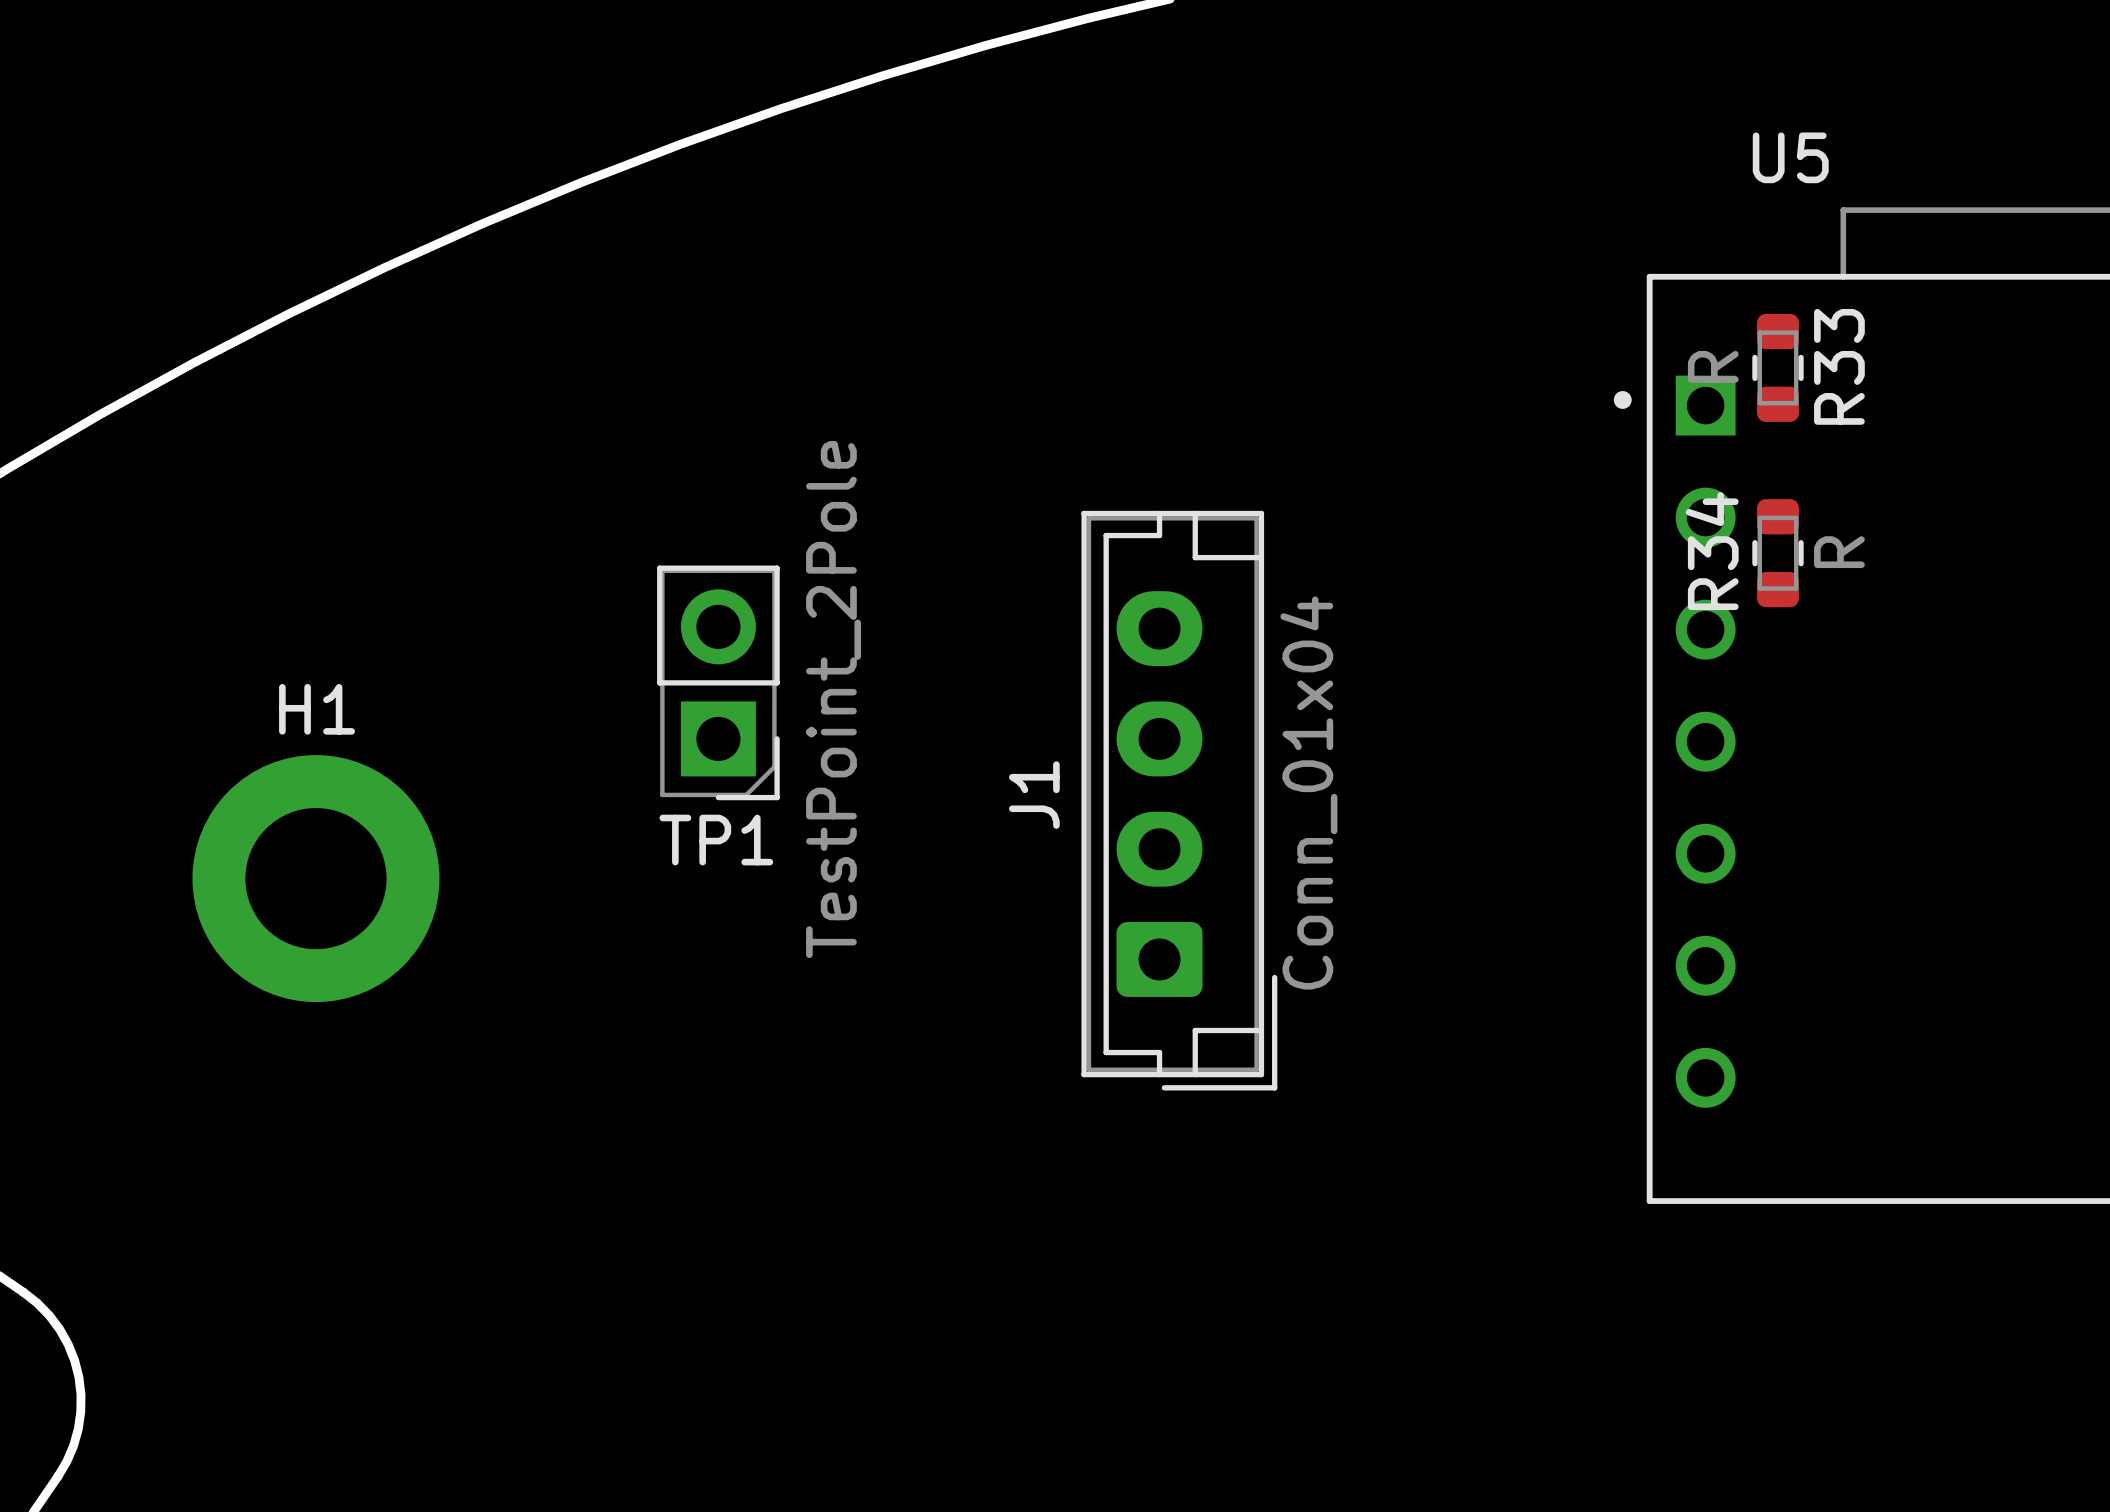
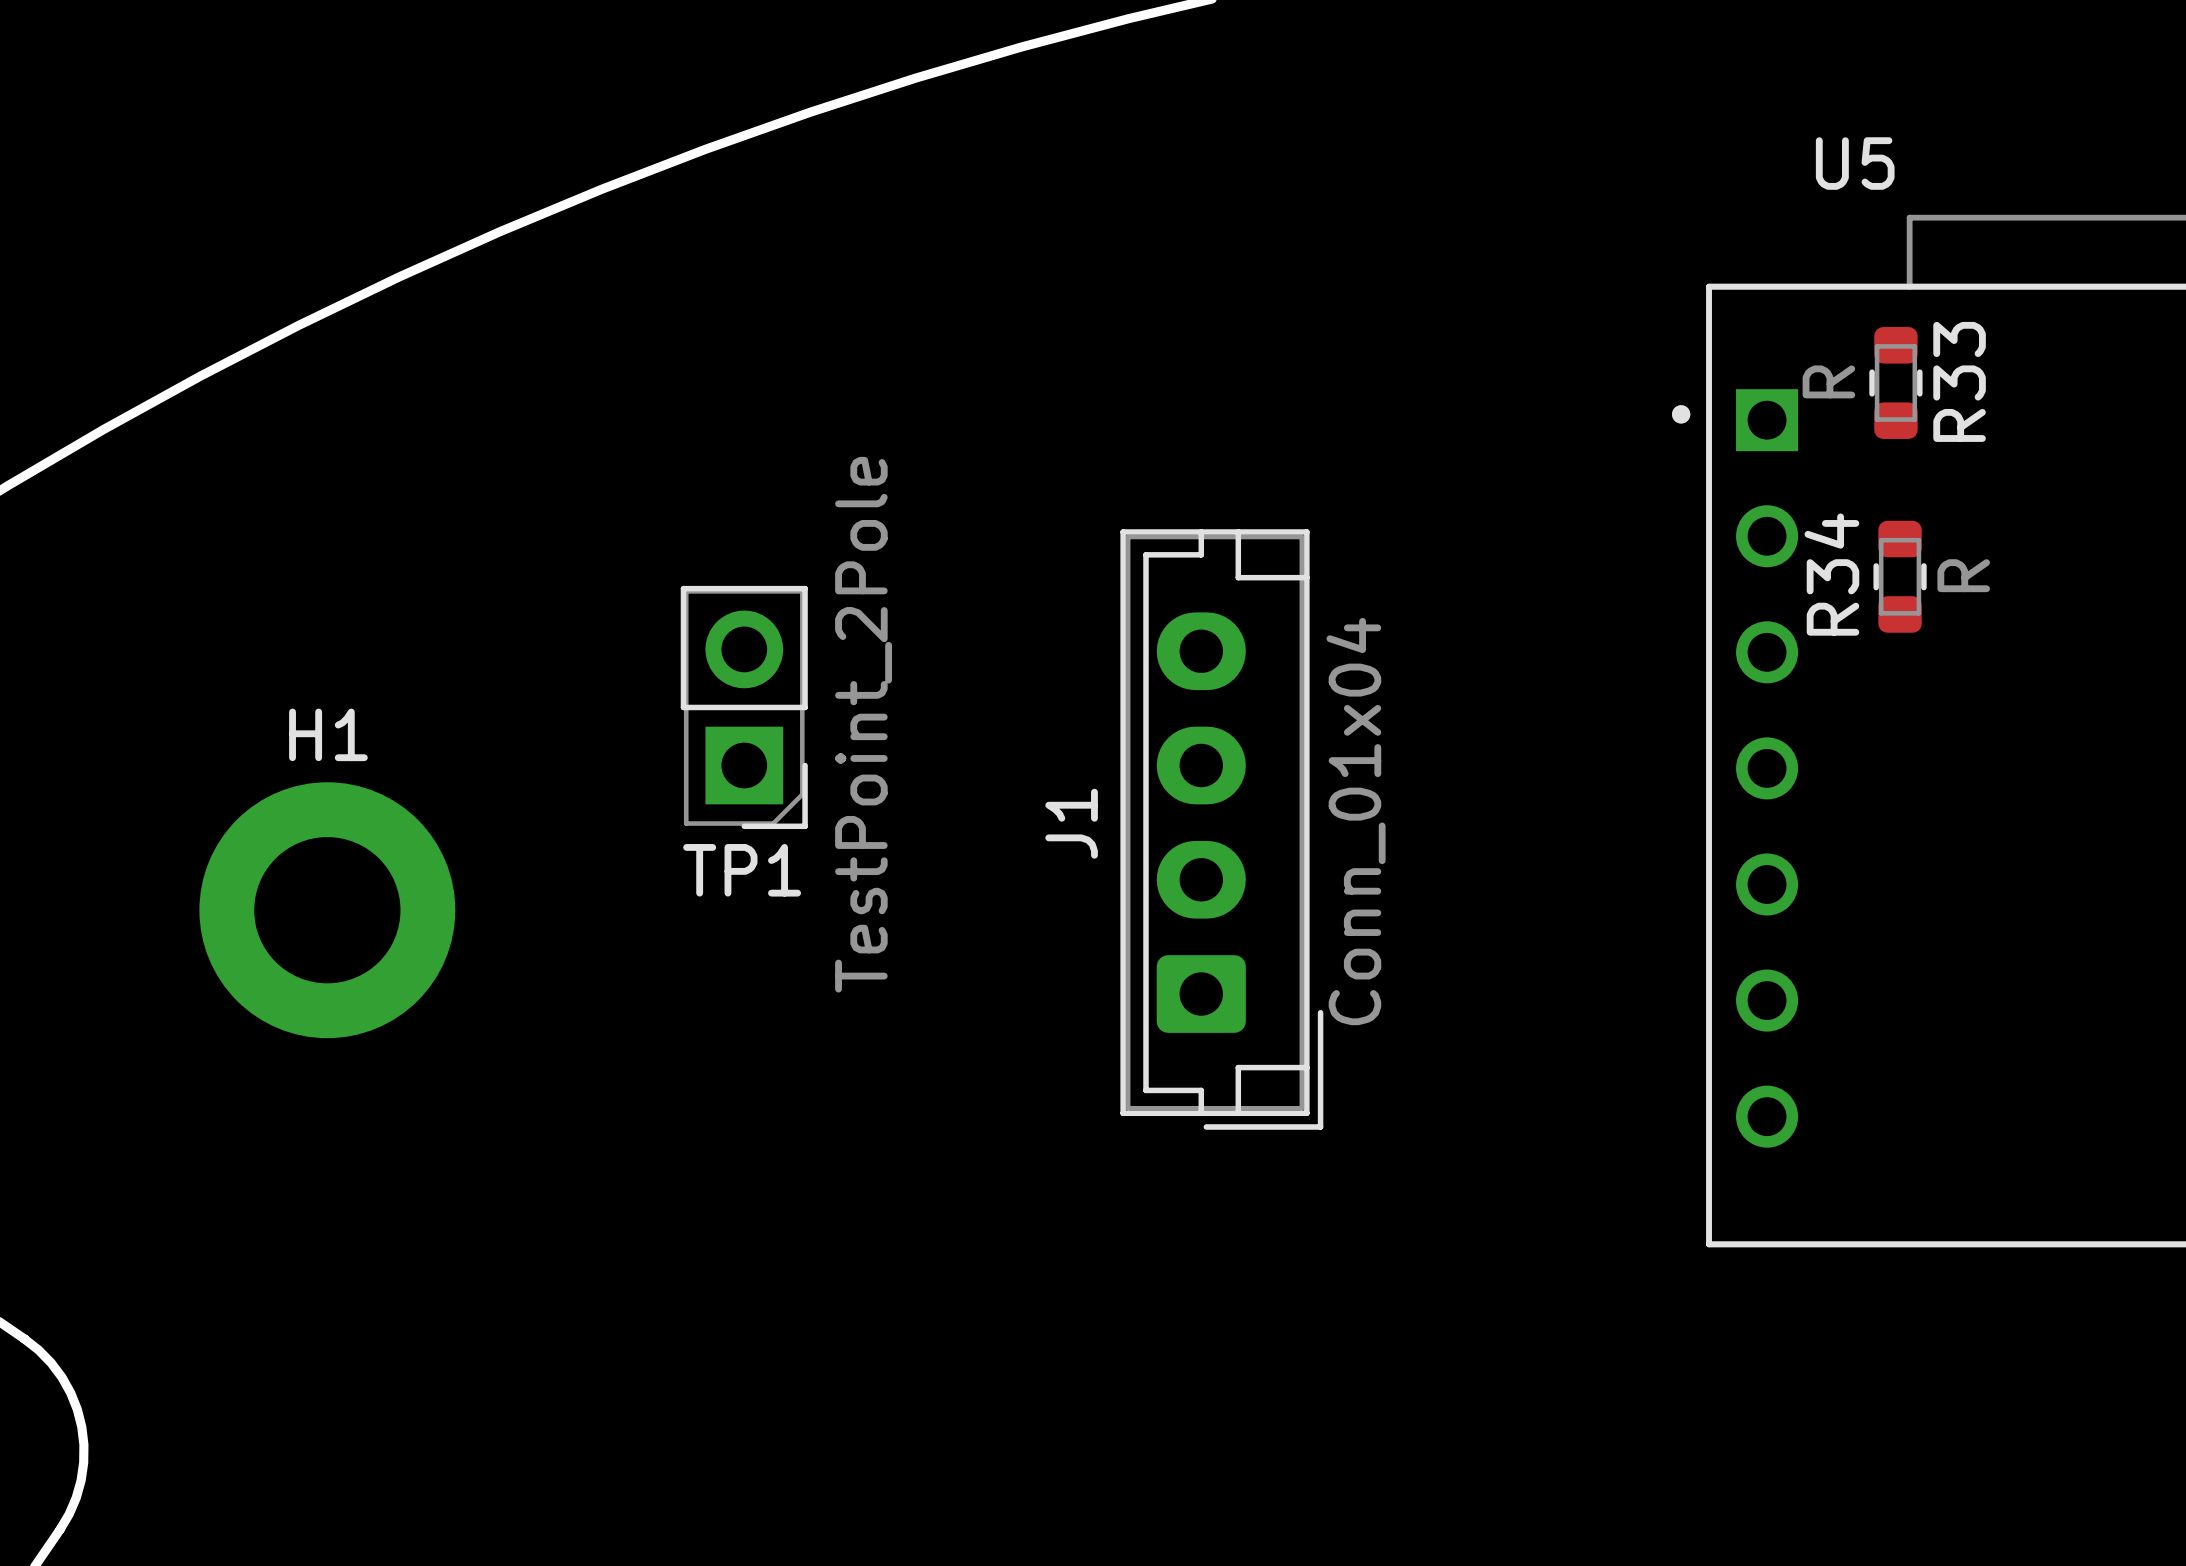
R33 position: (1778, 367) -> (1895, 382)
R34 position: (1778, 553) -> (1900, 576)

